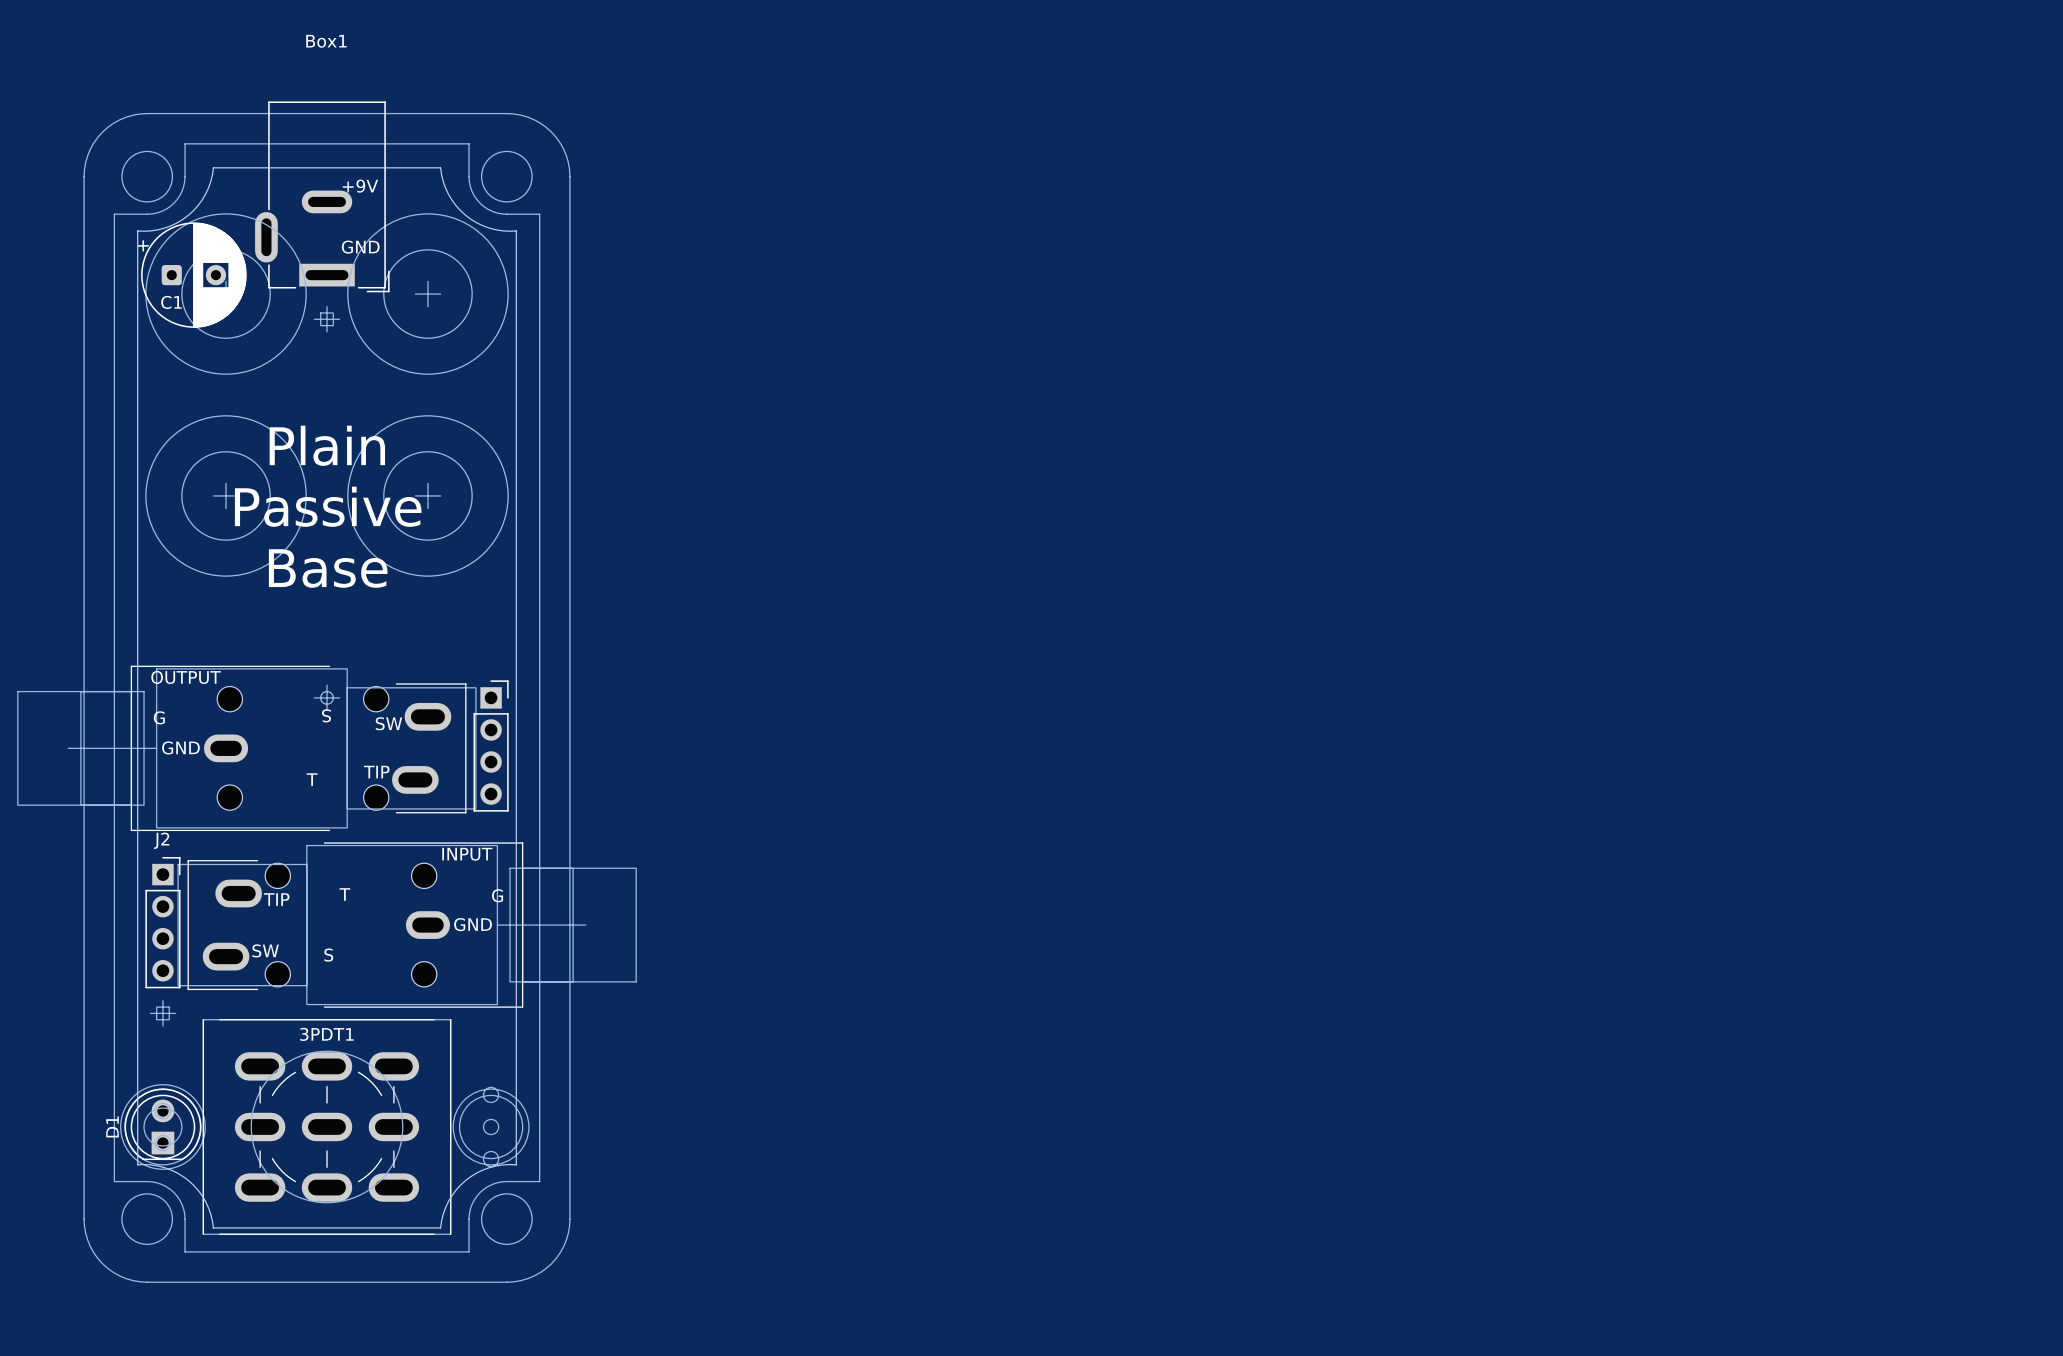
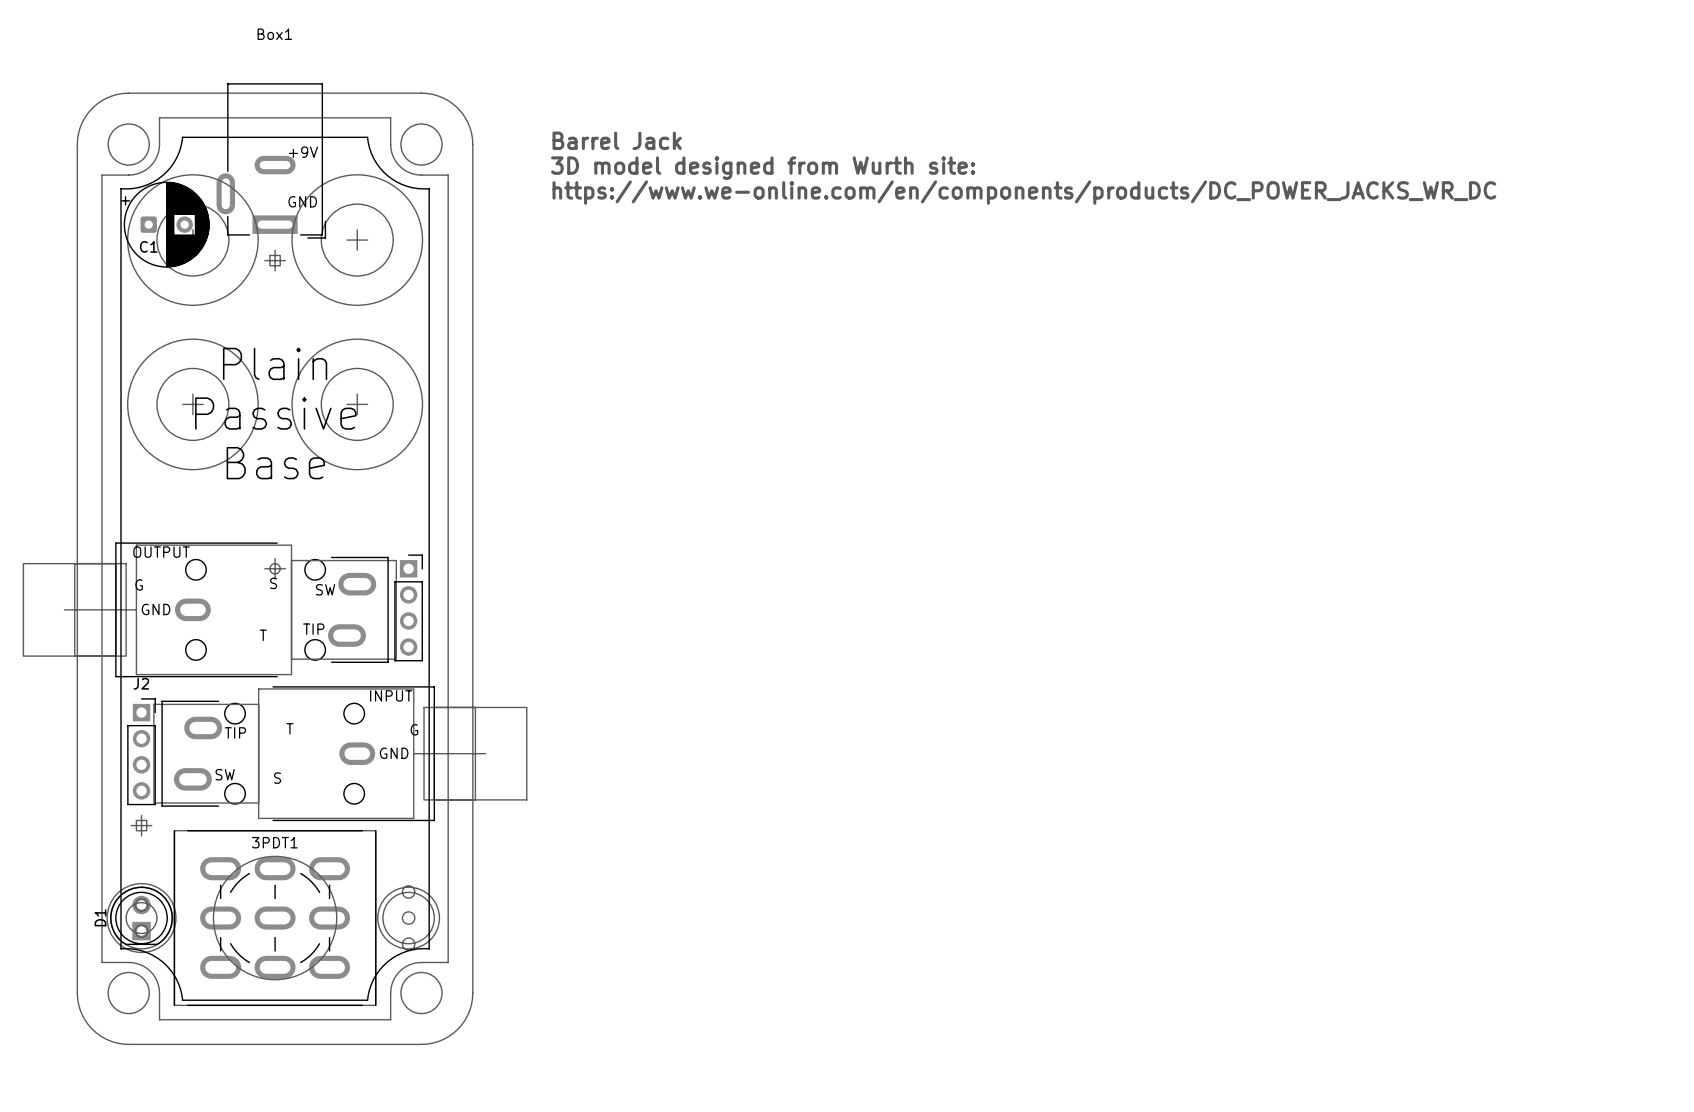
text: none -> Barrel Jack (617, 140)
text: none -> 3D model designed from Wurth site: (763, 168)
text: none -> https://www.we-online.com/en/components/products/DC_POWER_JACKS_WR_DC (1024, 192)

